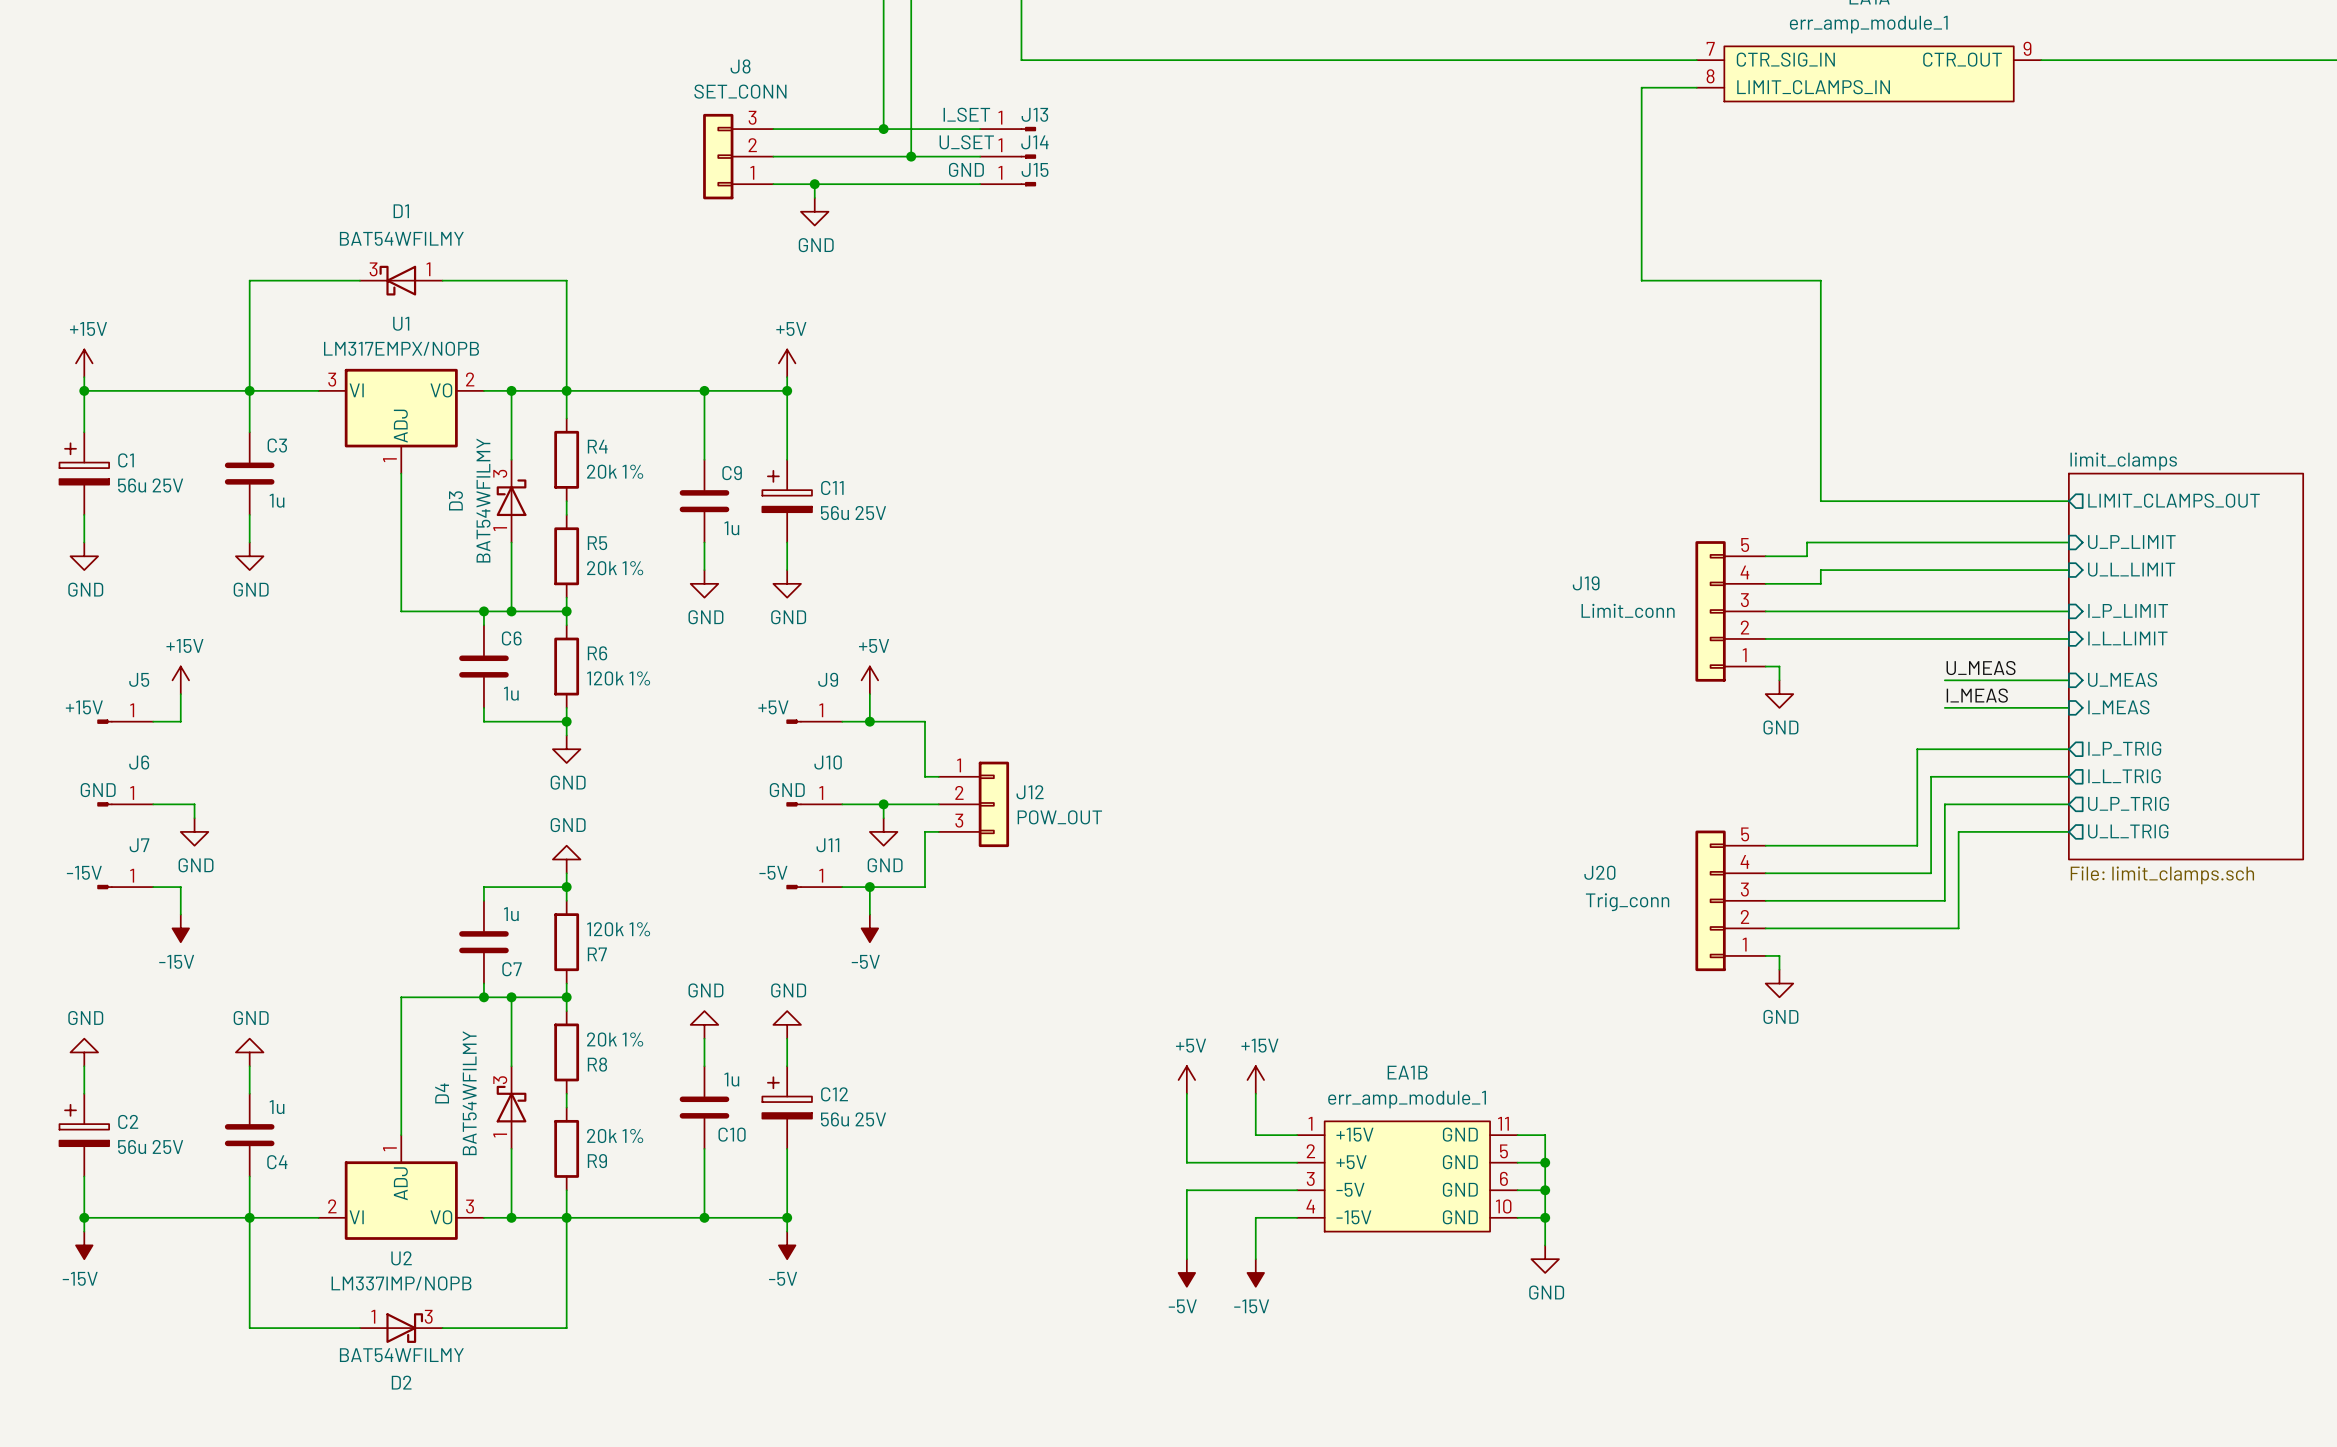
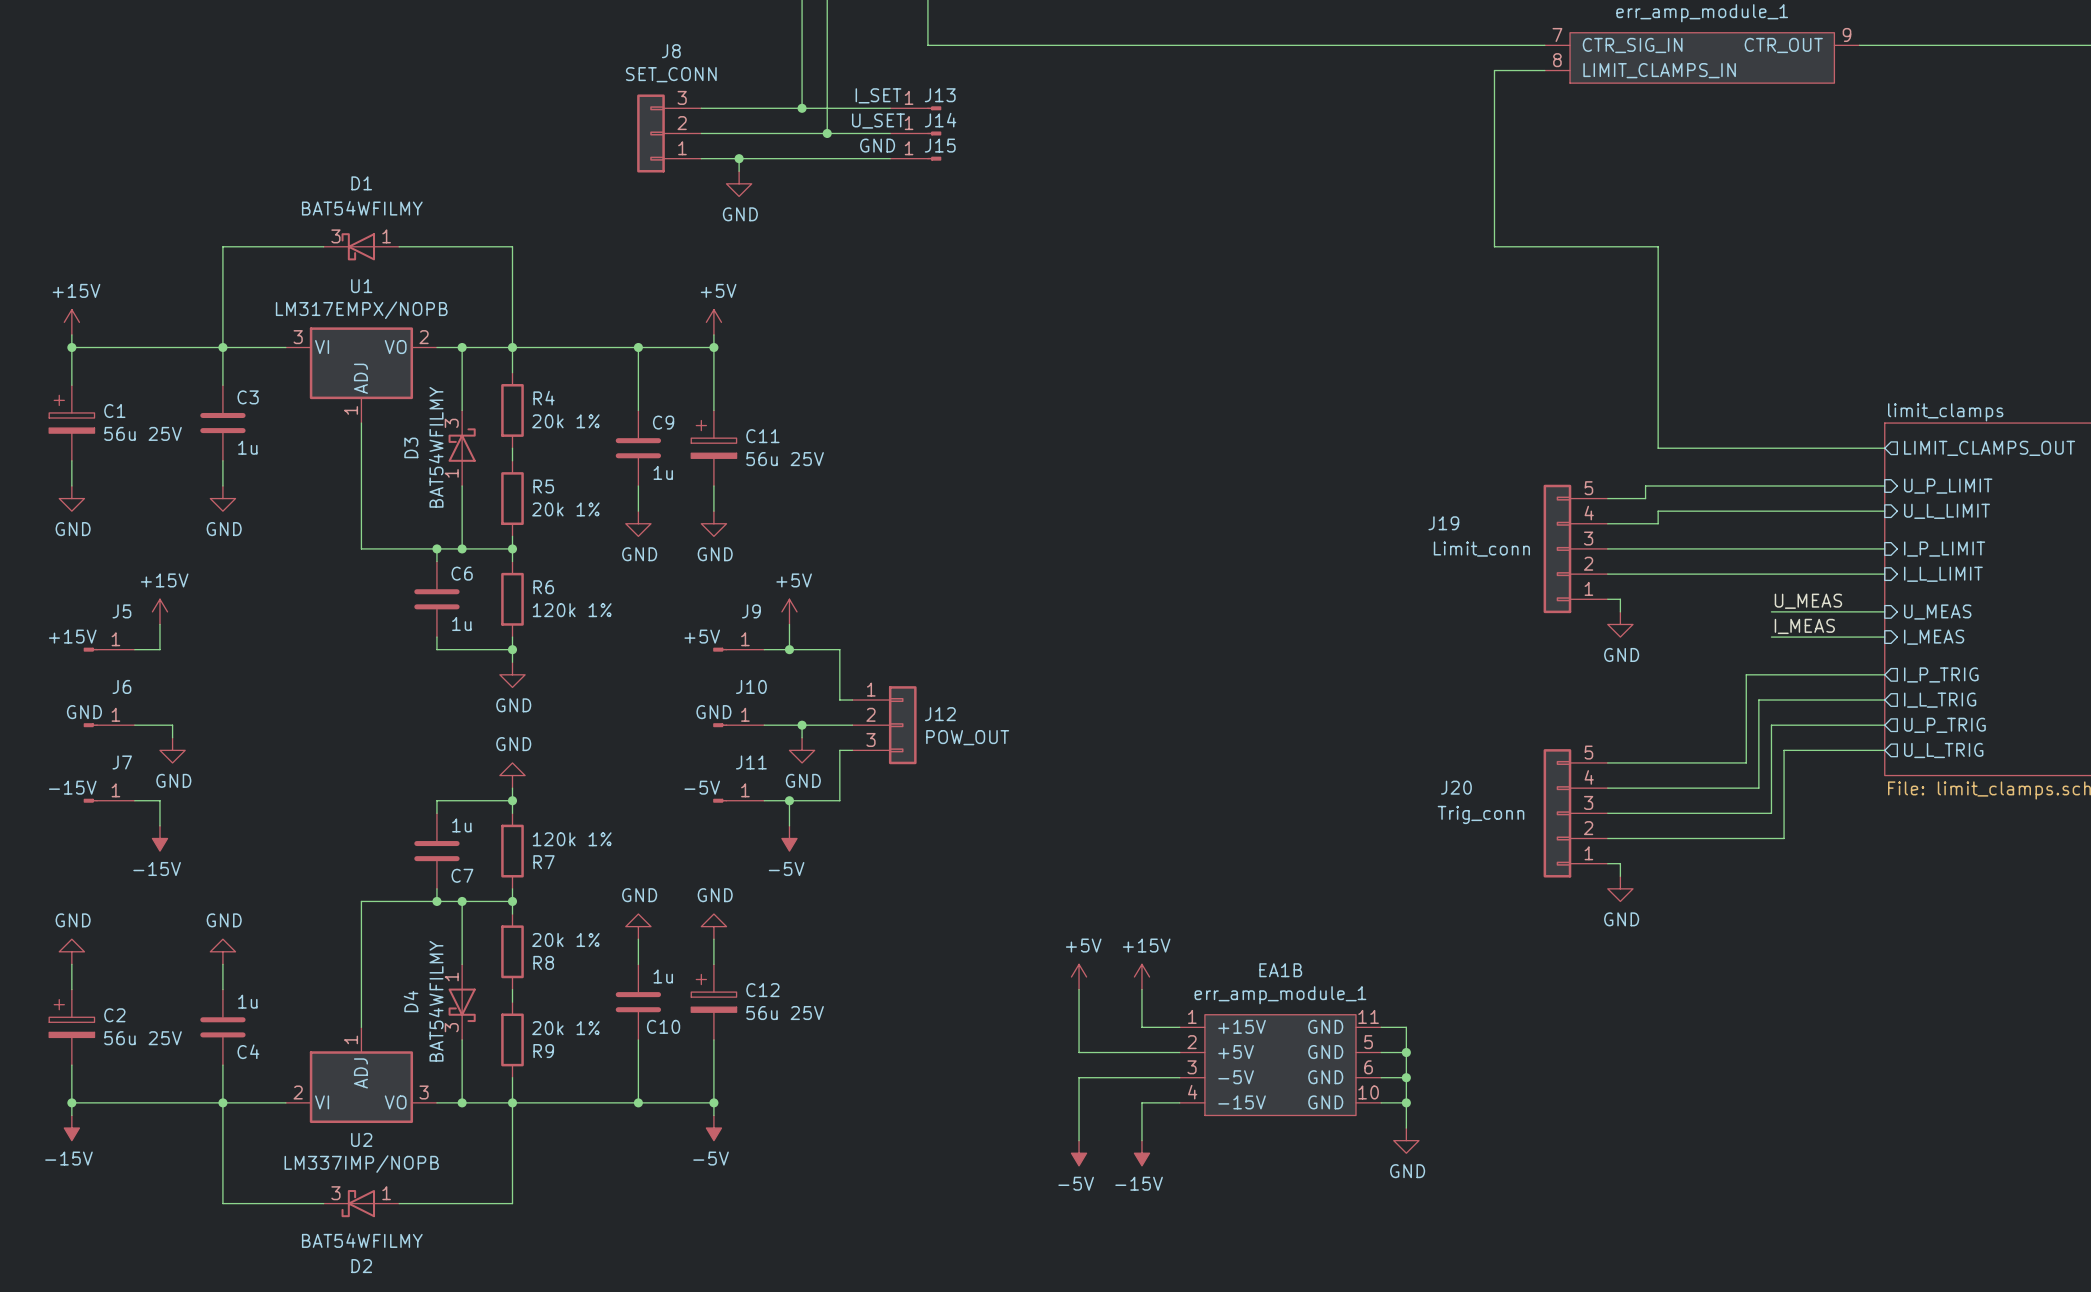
D4 rotation: 0° (511, 1104) -> 180° (462, 1005)
D2 rotation: 0° (404, 1328) -> 180° (358, 1203)

